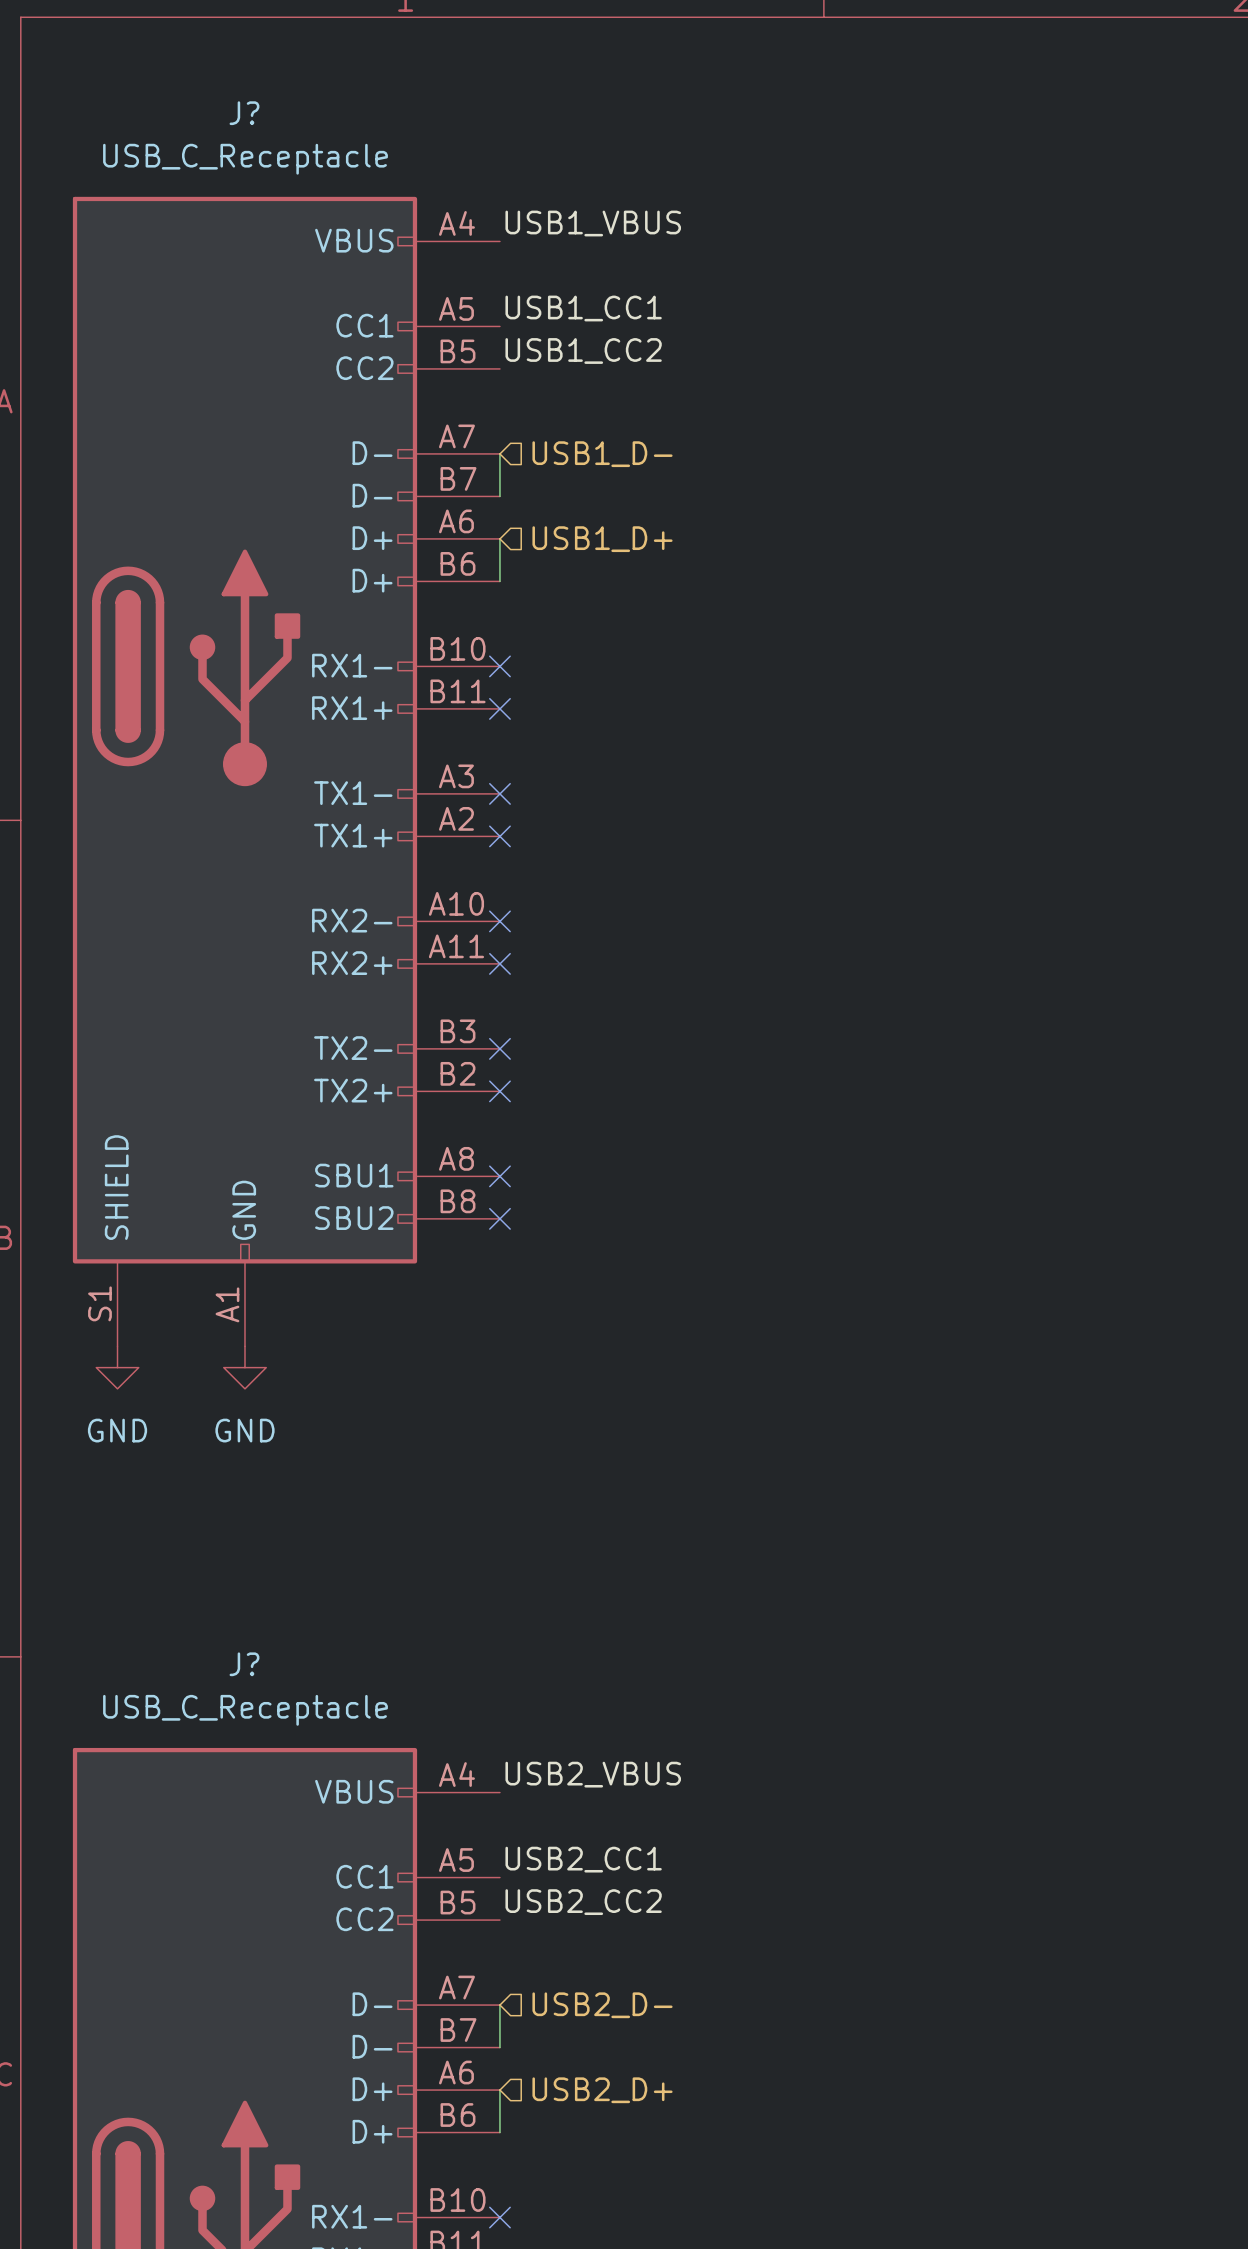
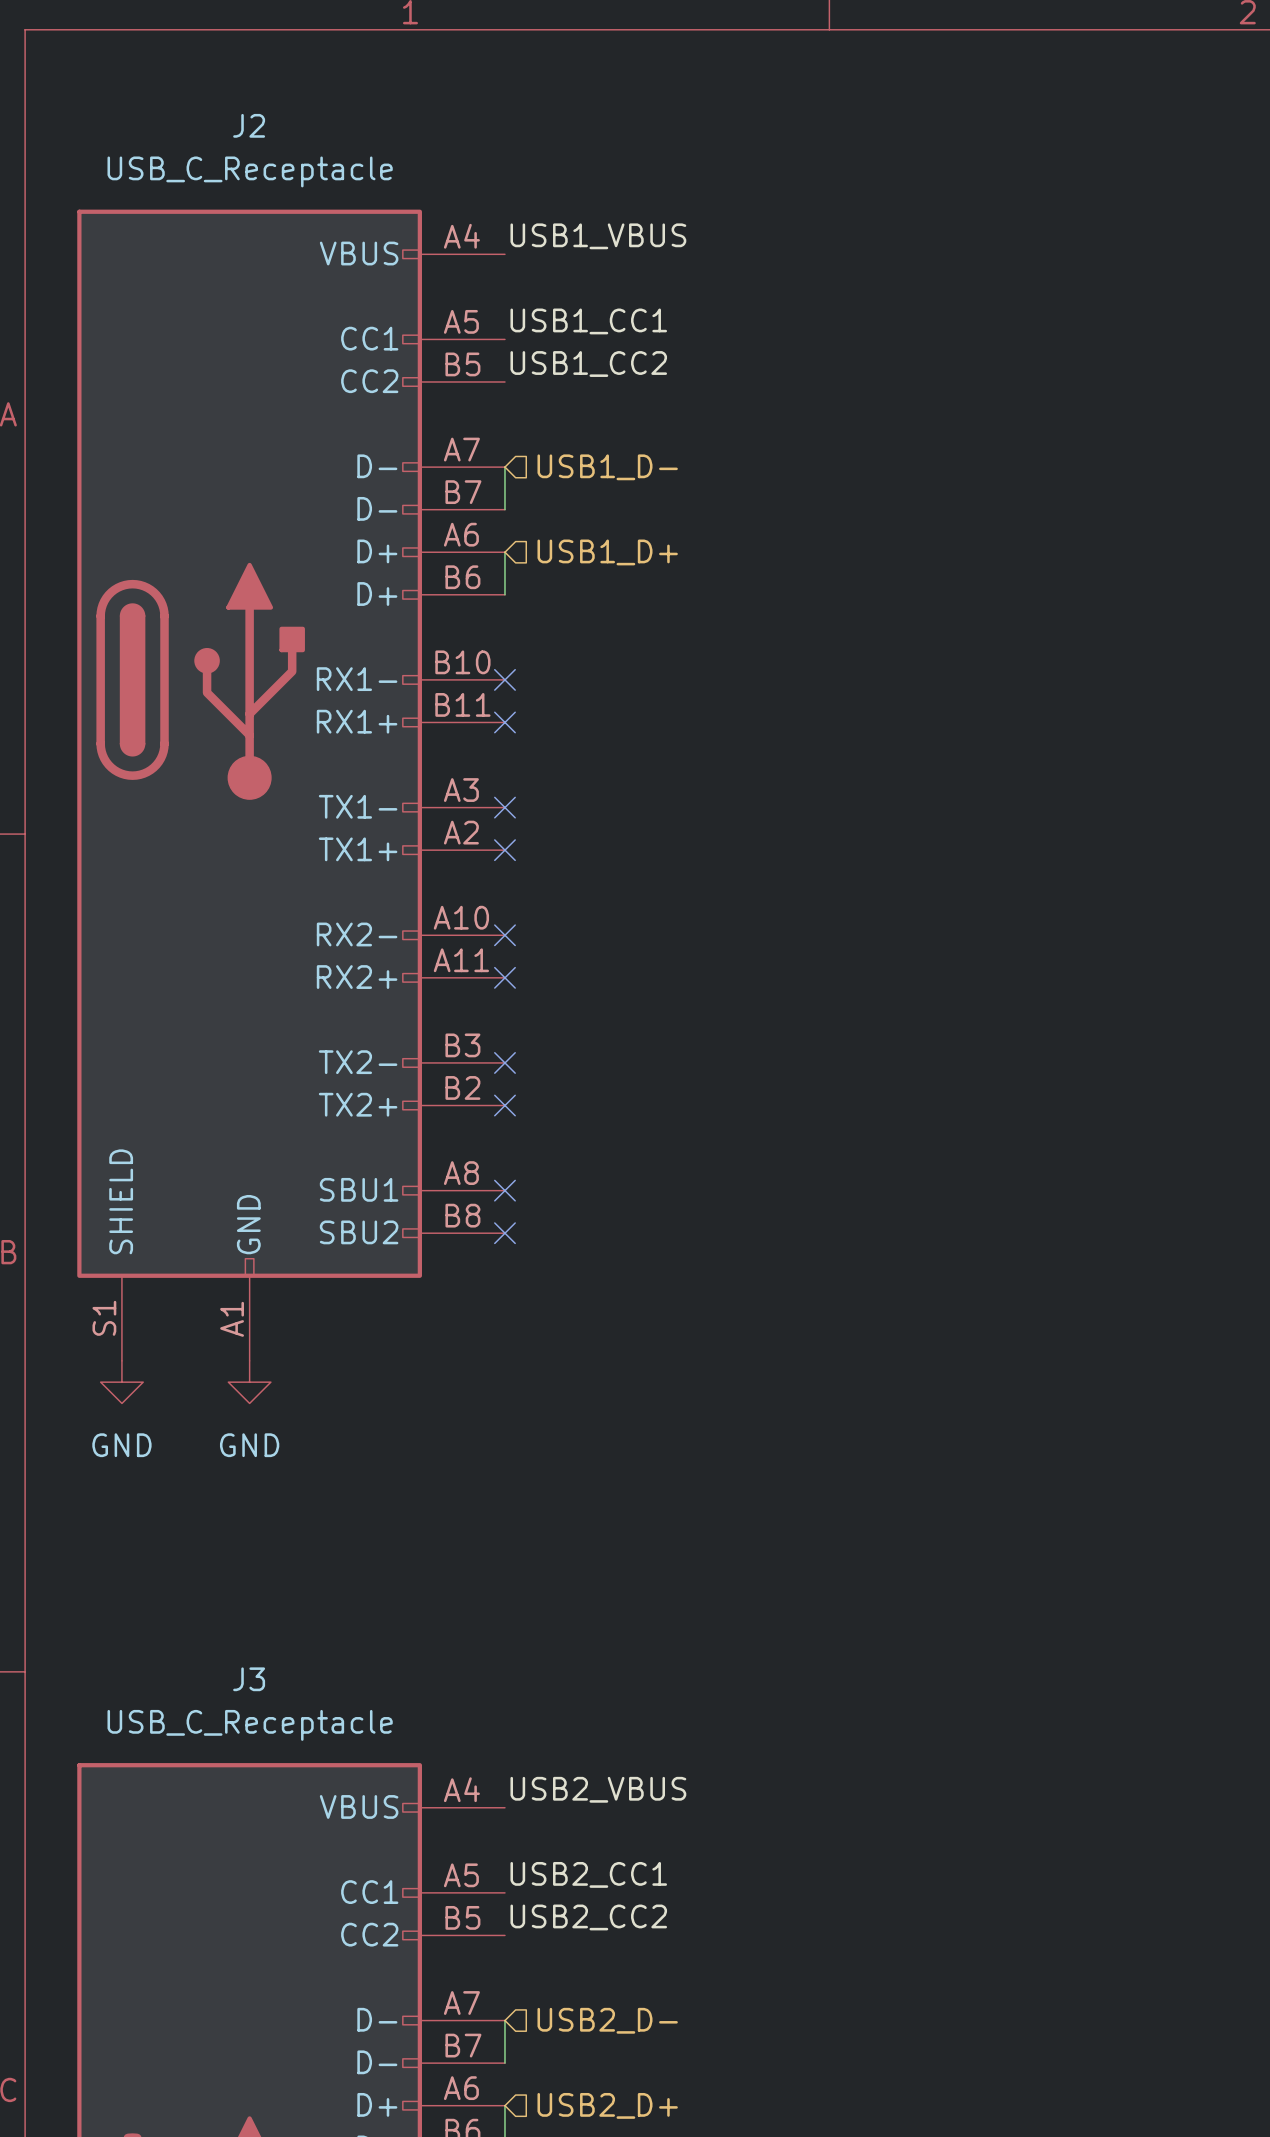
J? name: J? (244, 113) -> J2 (249, 125)
J? name: J? (244, 1664) -> J3 (249, 1679)

